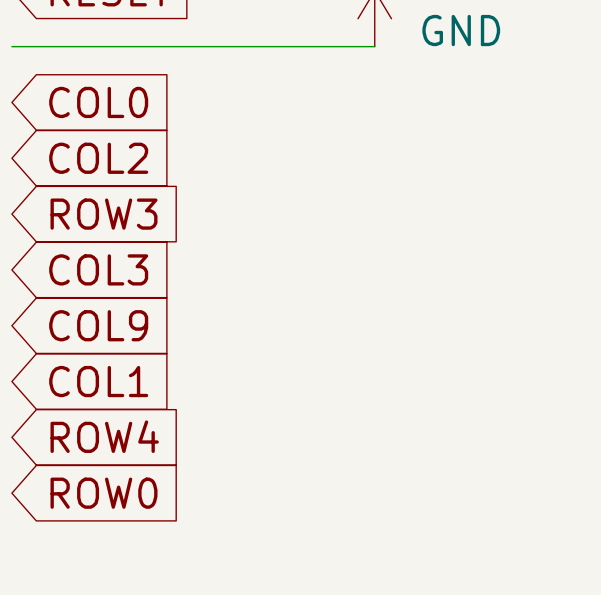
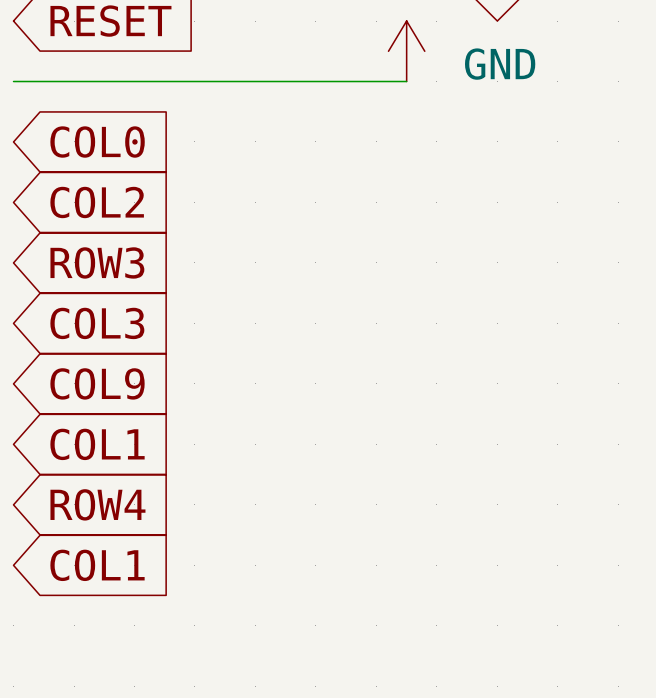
global label: ROW0 (104, 493) -> COL1 (97, 565)

